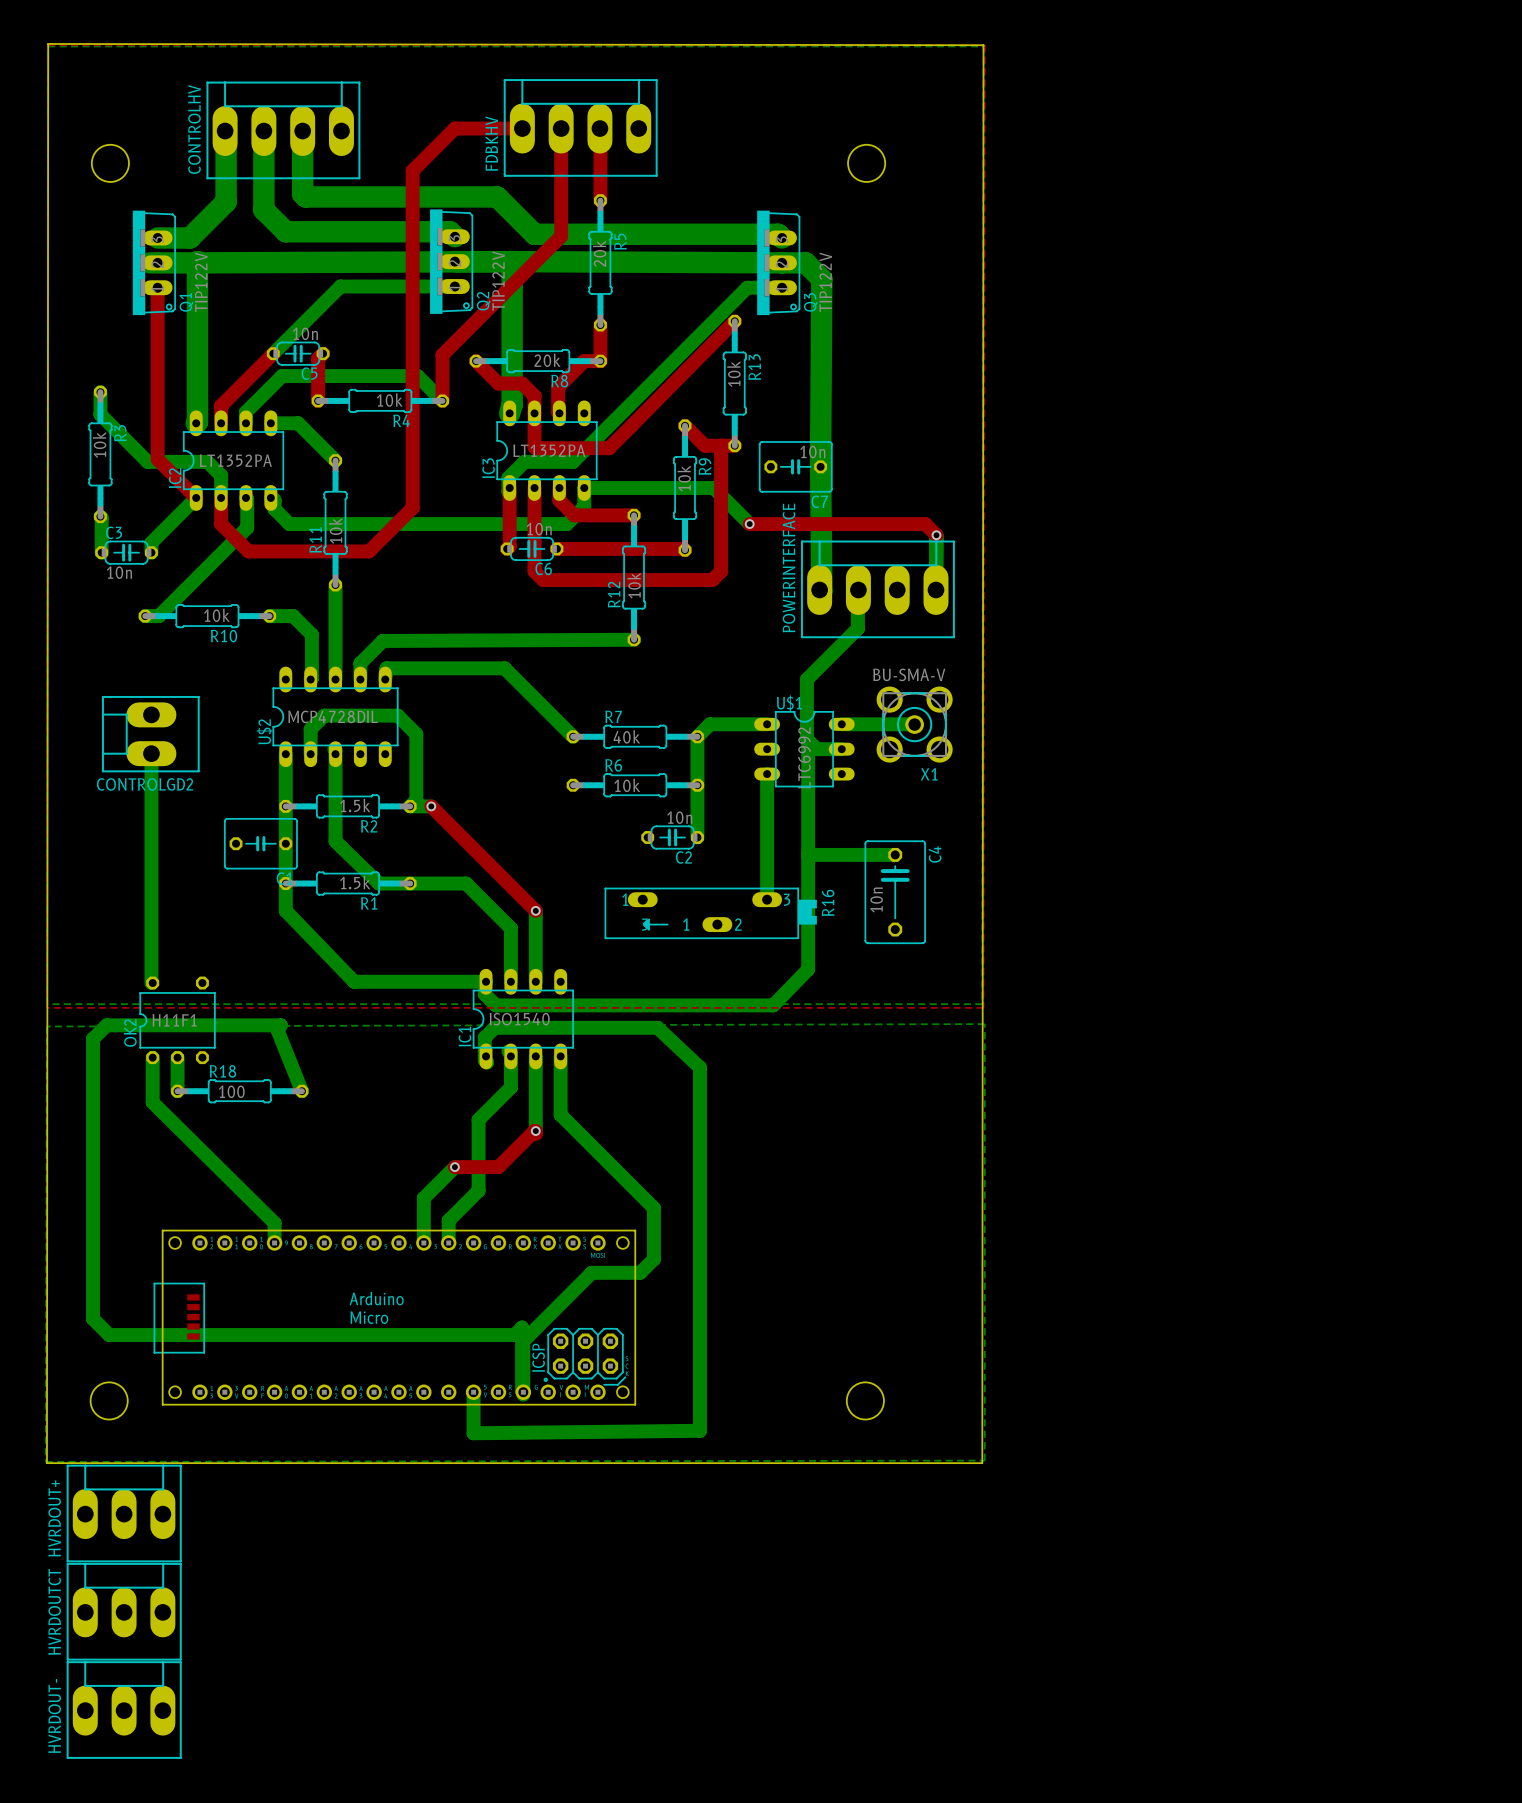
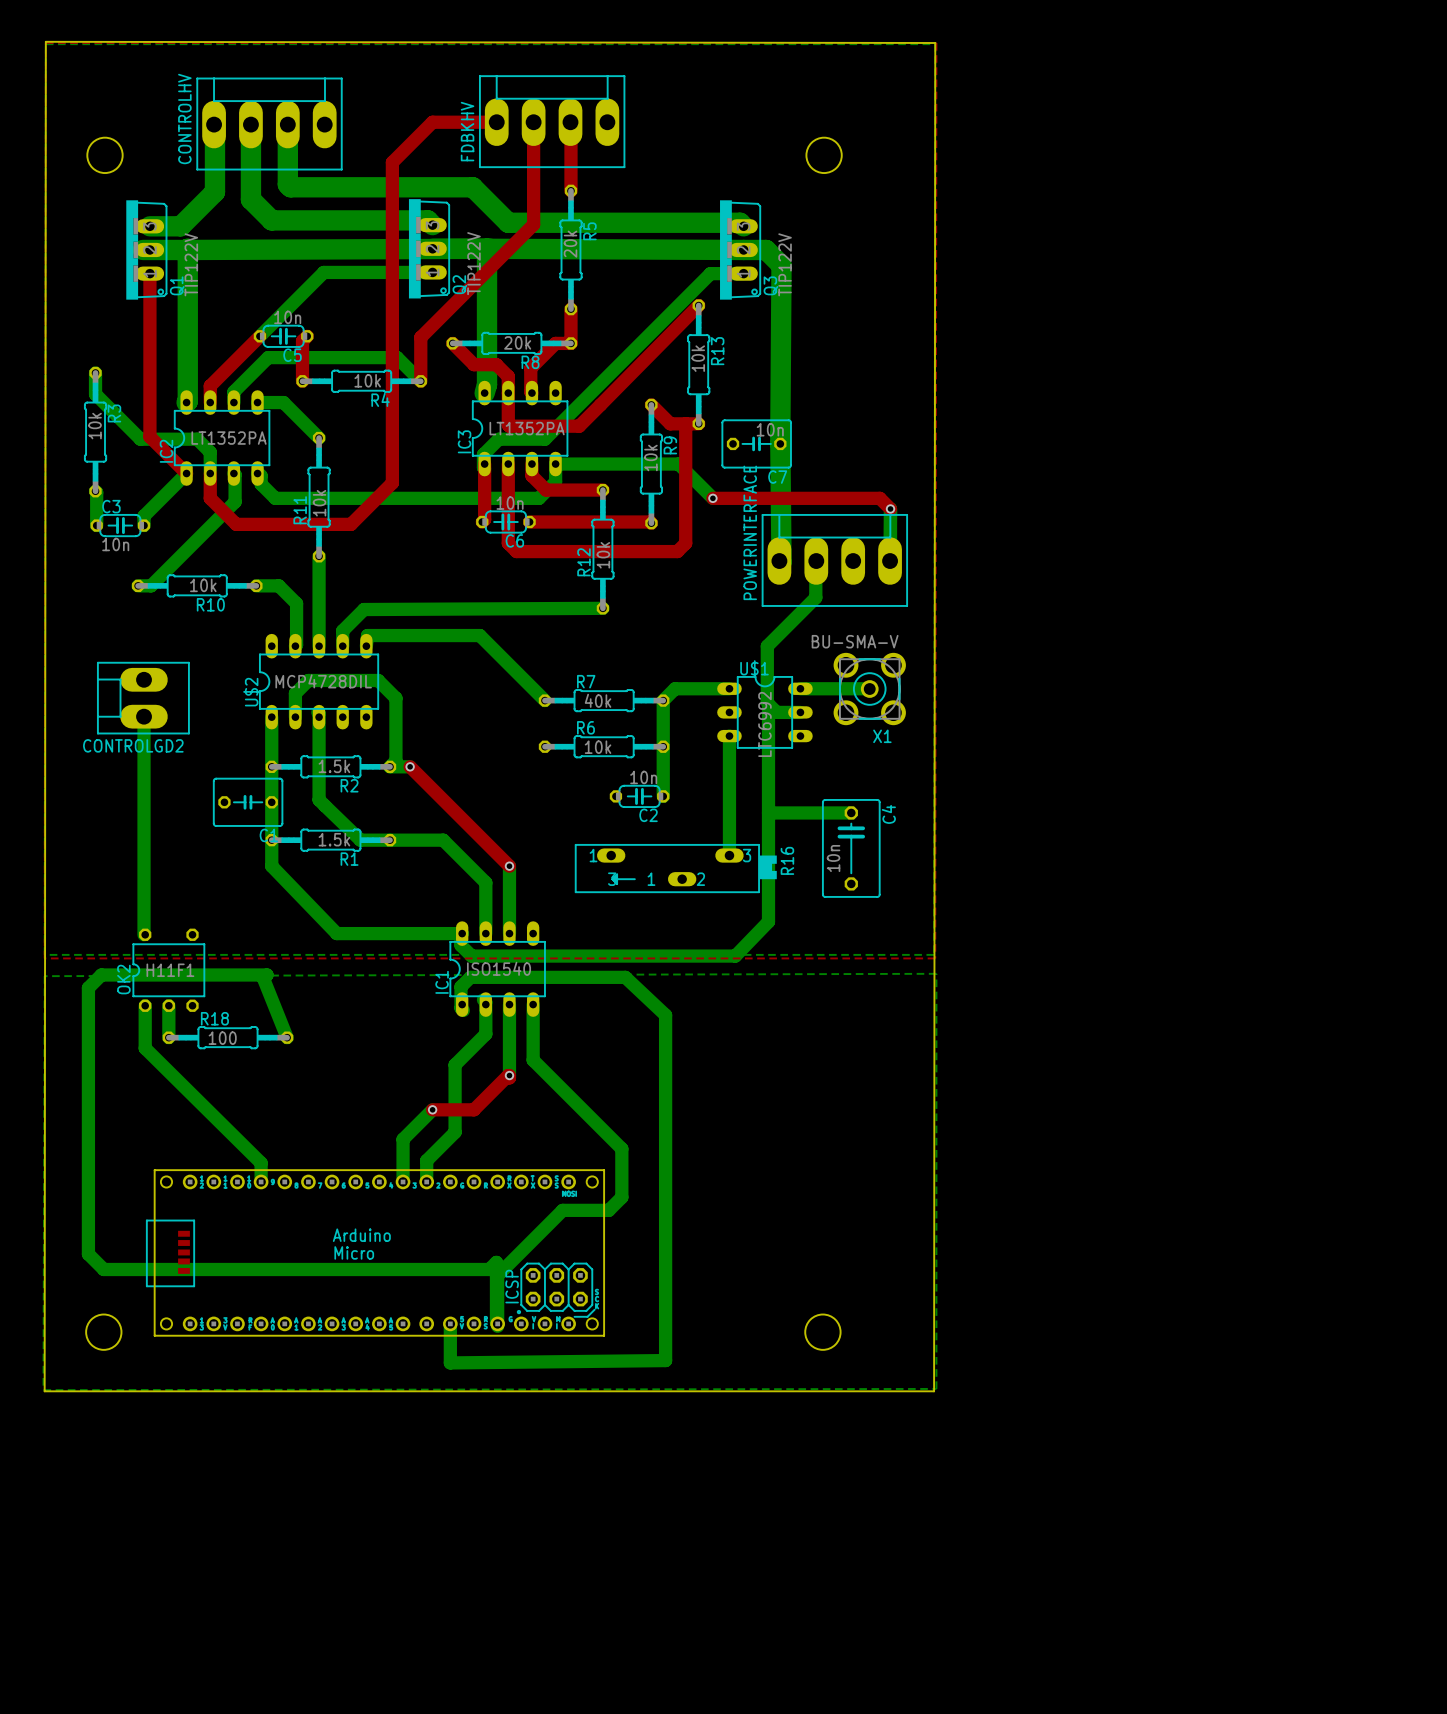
HVRDOUT+: (124, 1513) -> none
HVRDOUTCT: (124, 1611) -> none
HVRDOUT-: (124, 1710) -> none

